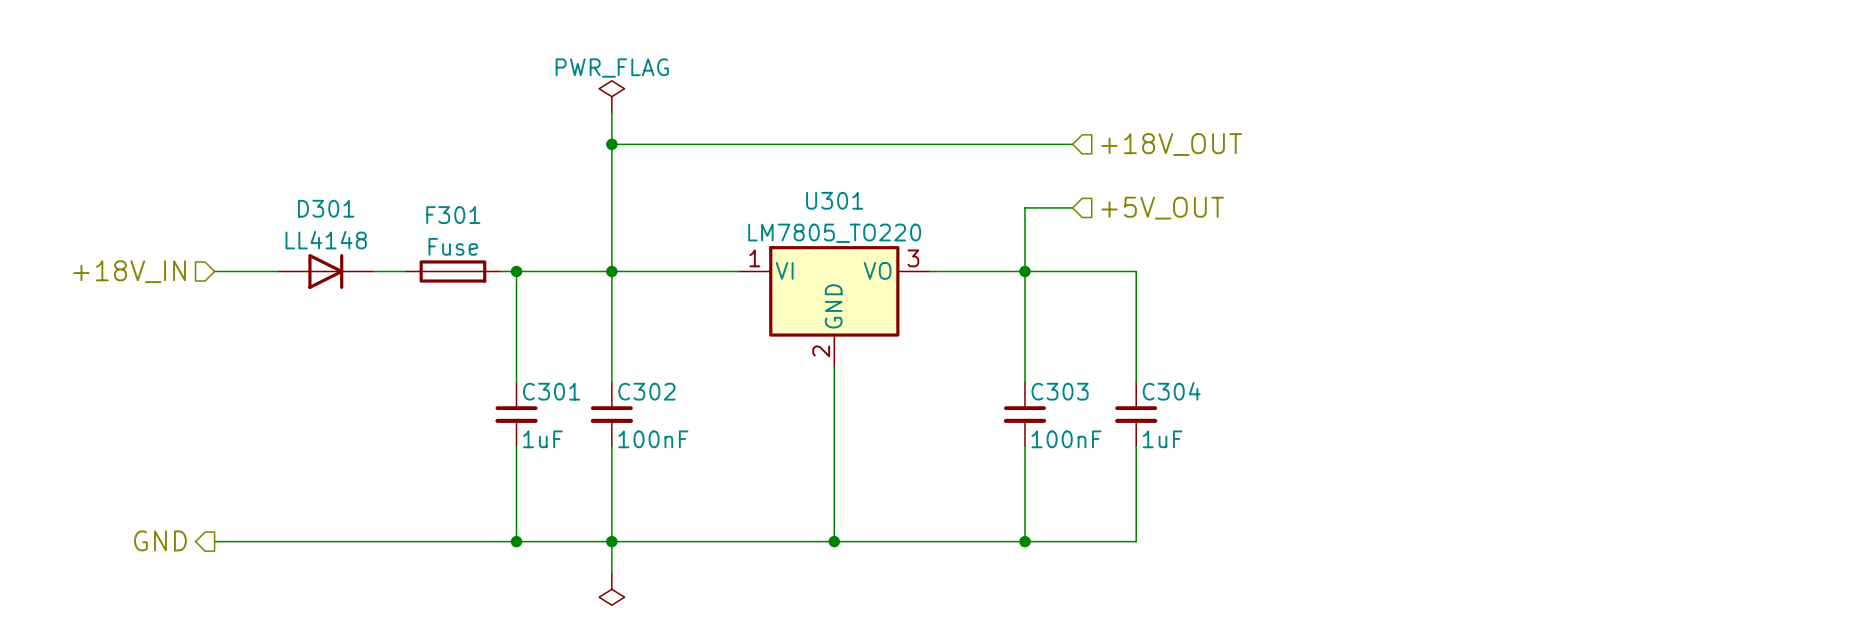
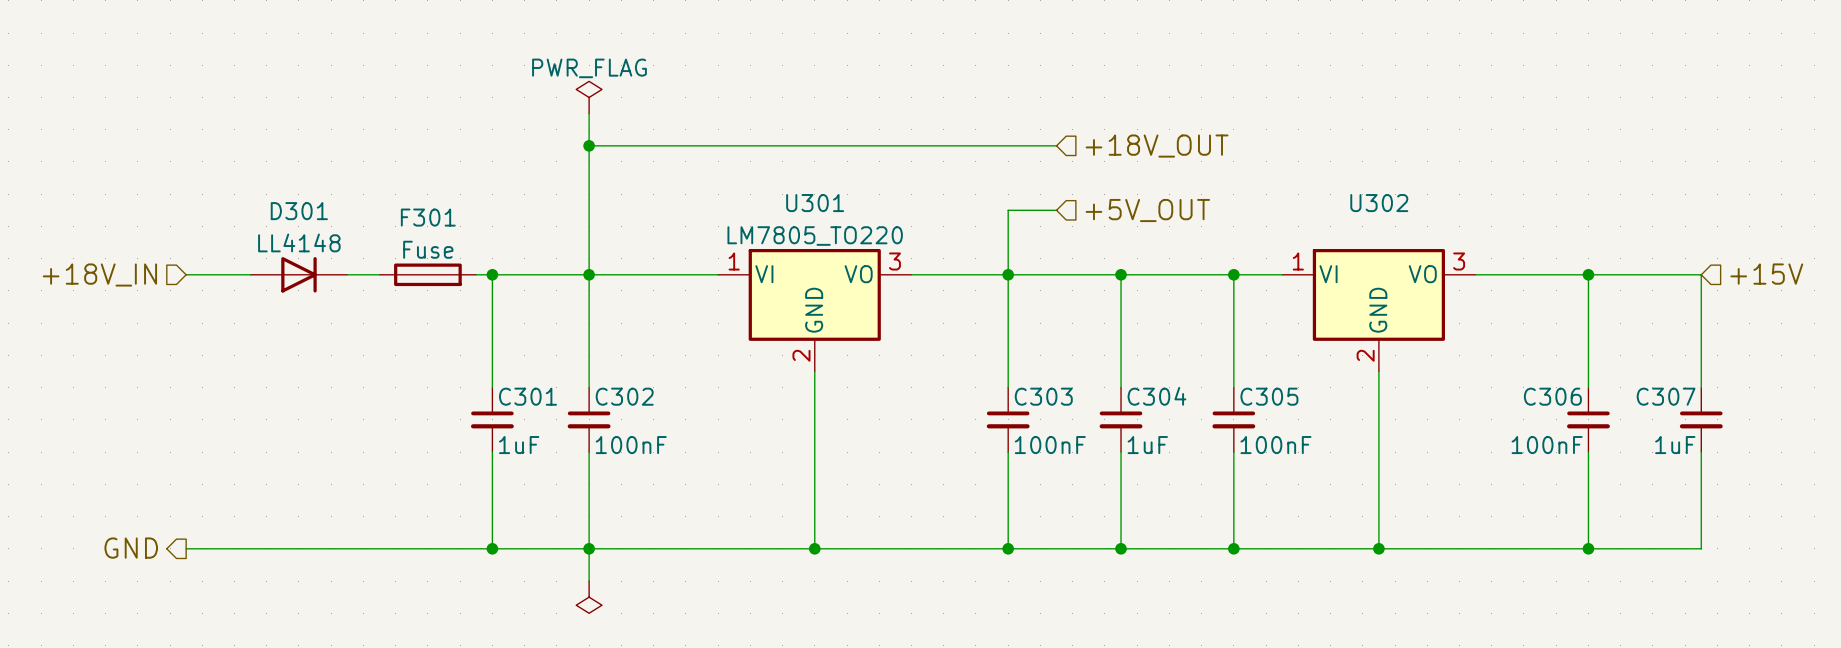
hierarchical label: none -> +15V (1766, 274)
wire: none -> (1121, 274) (1282, 274)
junction: none -> (1121, 274)
wire: none -> (1233, 274) (1233, 387)
junction: none -> (1233, 274)
wire: none -> (1475, 274) (1701, 274) (1701, 387)
wire: none -> (1588, 274) (1588, 387)
junction: none -> (1588, 274)
U302: none -> (1378, 310)
wire: none -> (1378, 371) (1378, 548)
C305: none -> 100nF (1233, 419)
C306: none -> 100nF (1588, 419)
C307: none -> 1uF (1701, 419)
wire: none -> (1233, 452) (1233, 548)
wire: none -> (1588, 452) (1588, 548)
wire: none -> (1701, 452) (1701, 548) (1121, 548)
junction: none -> (1121, 548)
junction: none -> (1233, 548)
junction: none -> (1378, 548)
junction: none -> (1588, 548)

